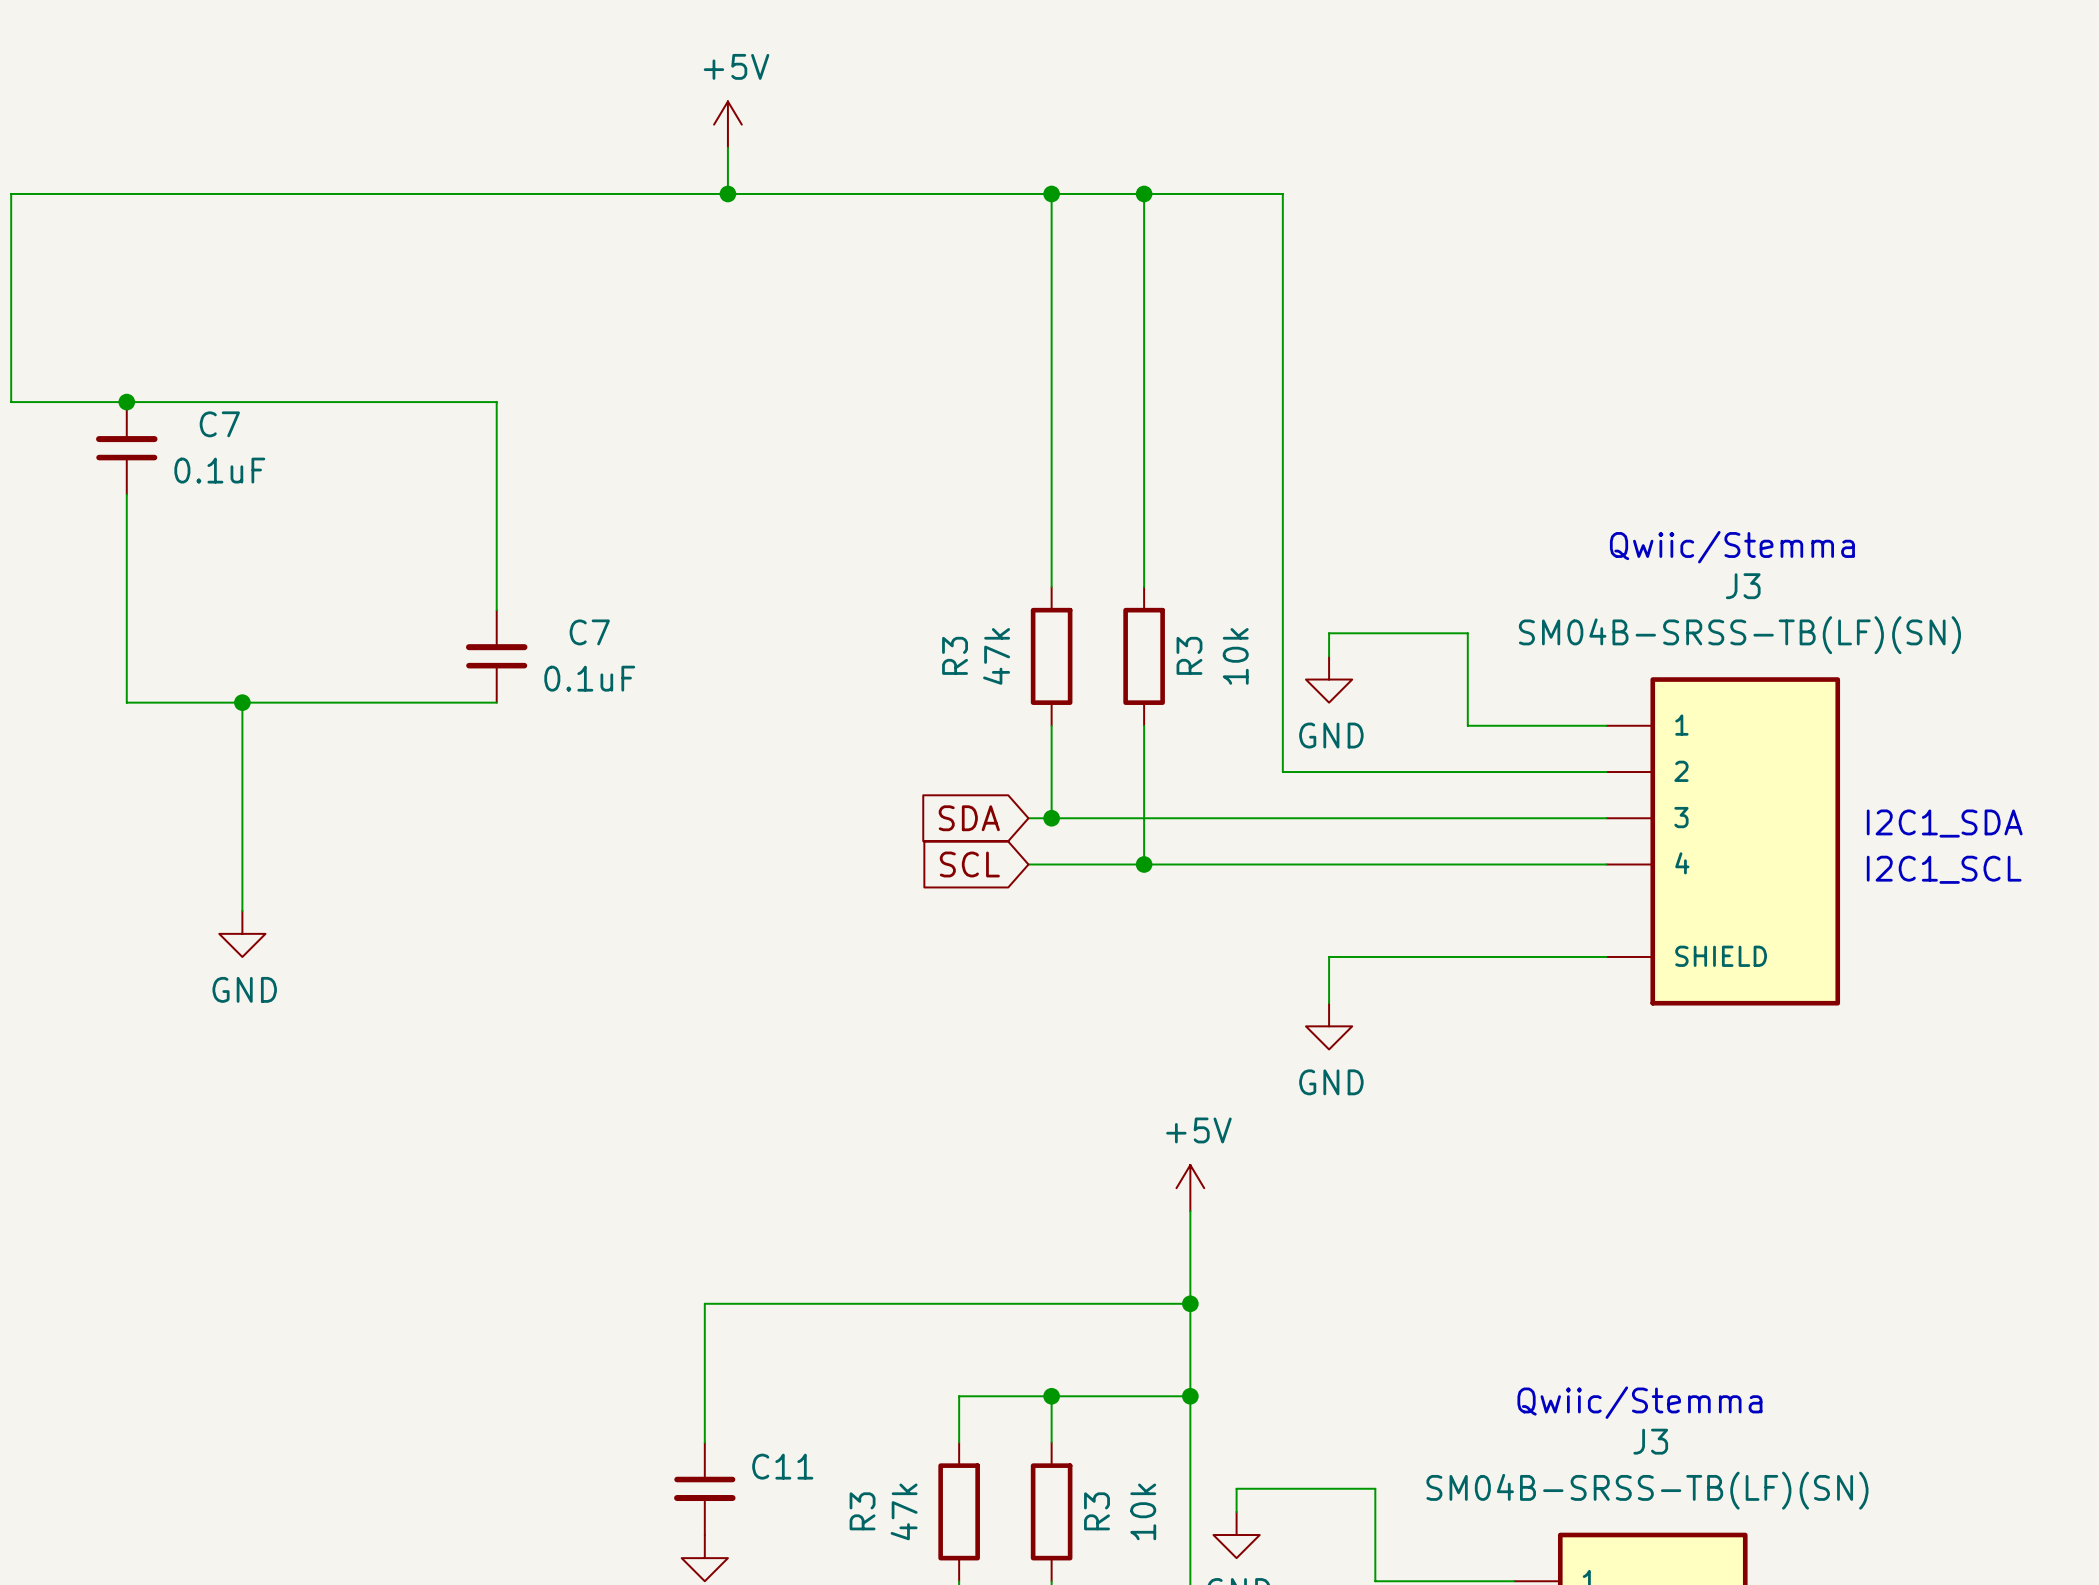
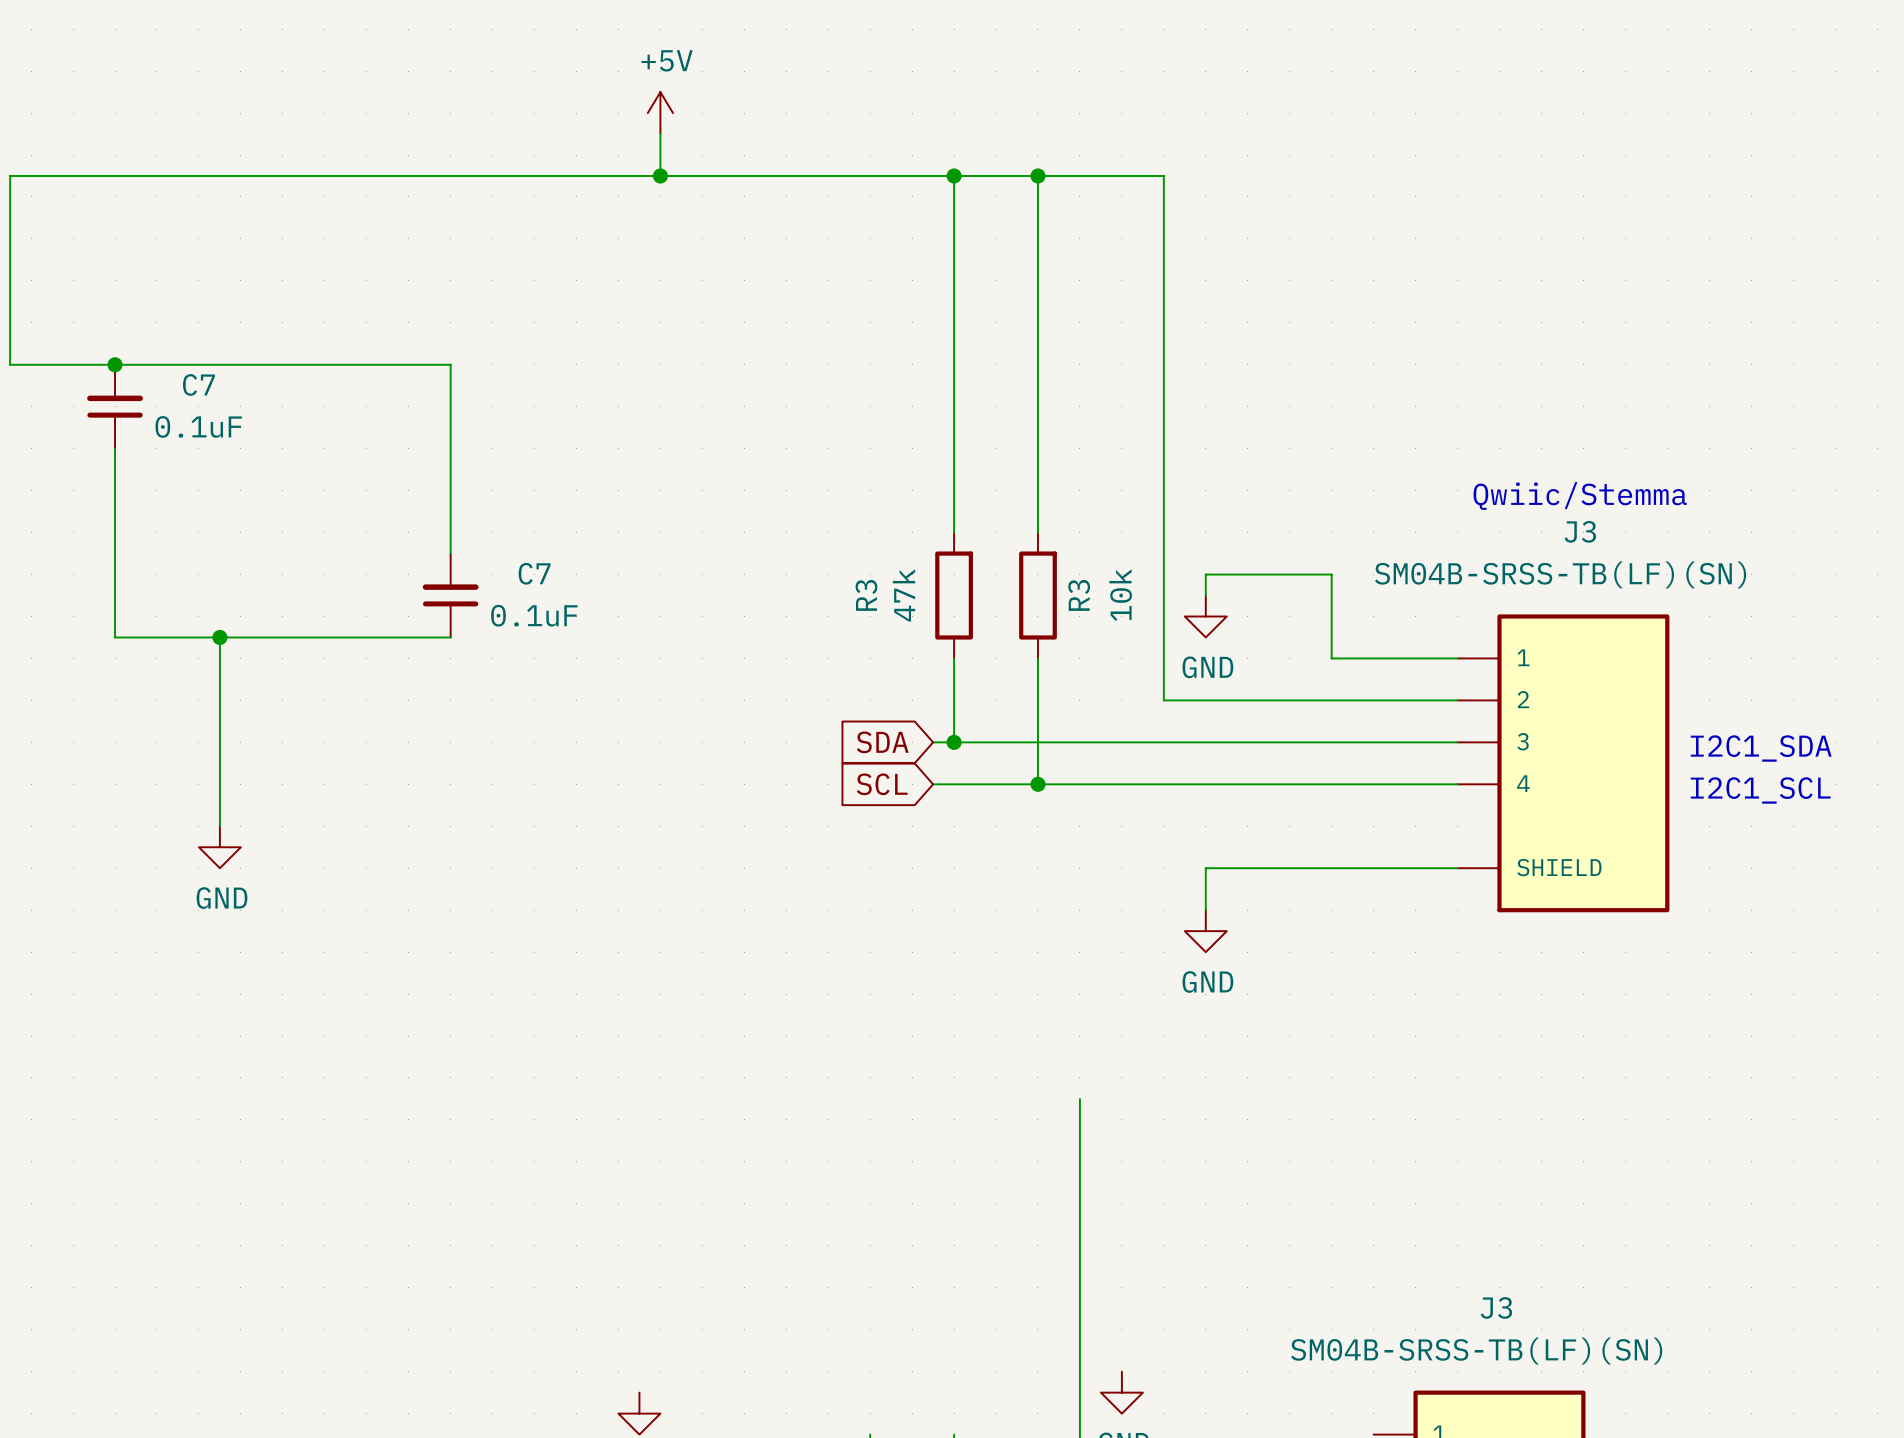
power symbol: +5V (1190, 1188) -> none
wire: (1190, 1303) (704, 1303) (704, 1442) -> none
junction: (1190, 1303) -> none
wire: (1051, 1396) (1051, 1442) -> none
junction: (1051, 1396) -> none
wire: (1190, 1396) (959, 1396) (959, 1442) -> none
junction: (1190, 1396) -> none
text: Qwiic/Stemma (1639, 1402) -> none
C11: (704, 1488) -> none
R3: 47k (959, 1511) -> none
R3: 10k (1051, 1511) -> none
wire: (1236, 1511) (1236, 1488) (1375, 1488) (1375, 1581) (1514, 1581) -> none

